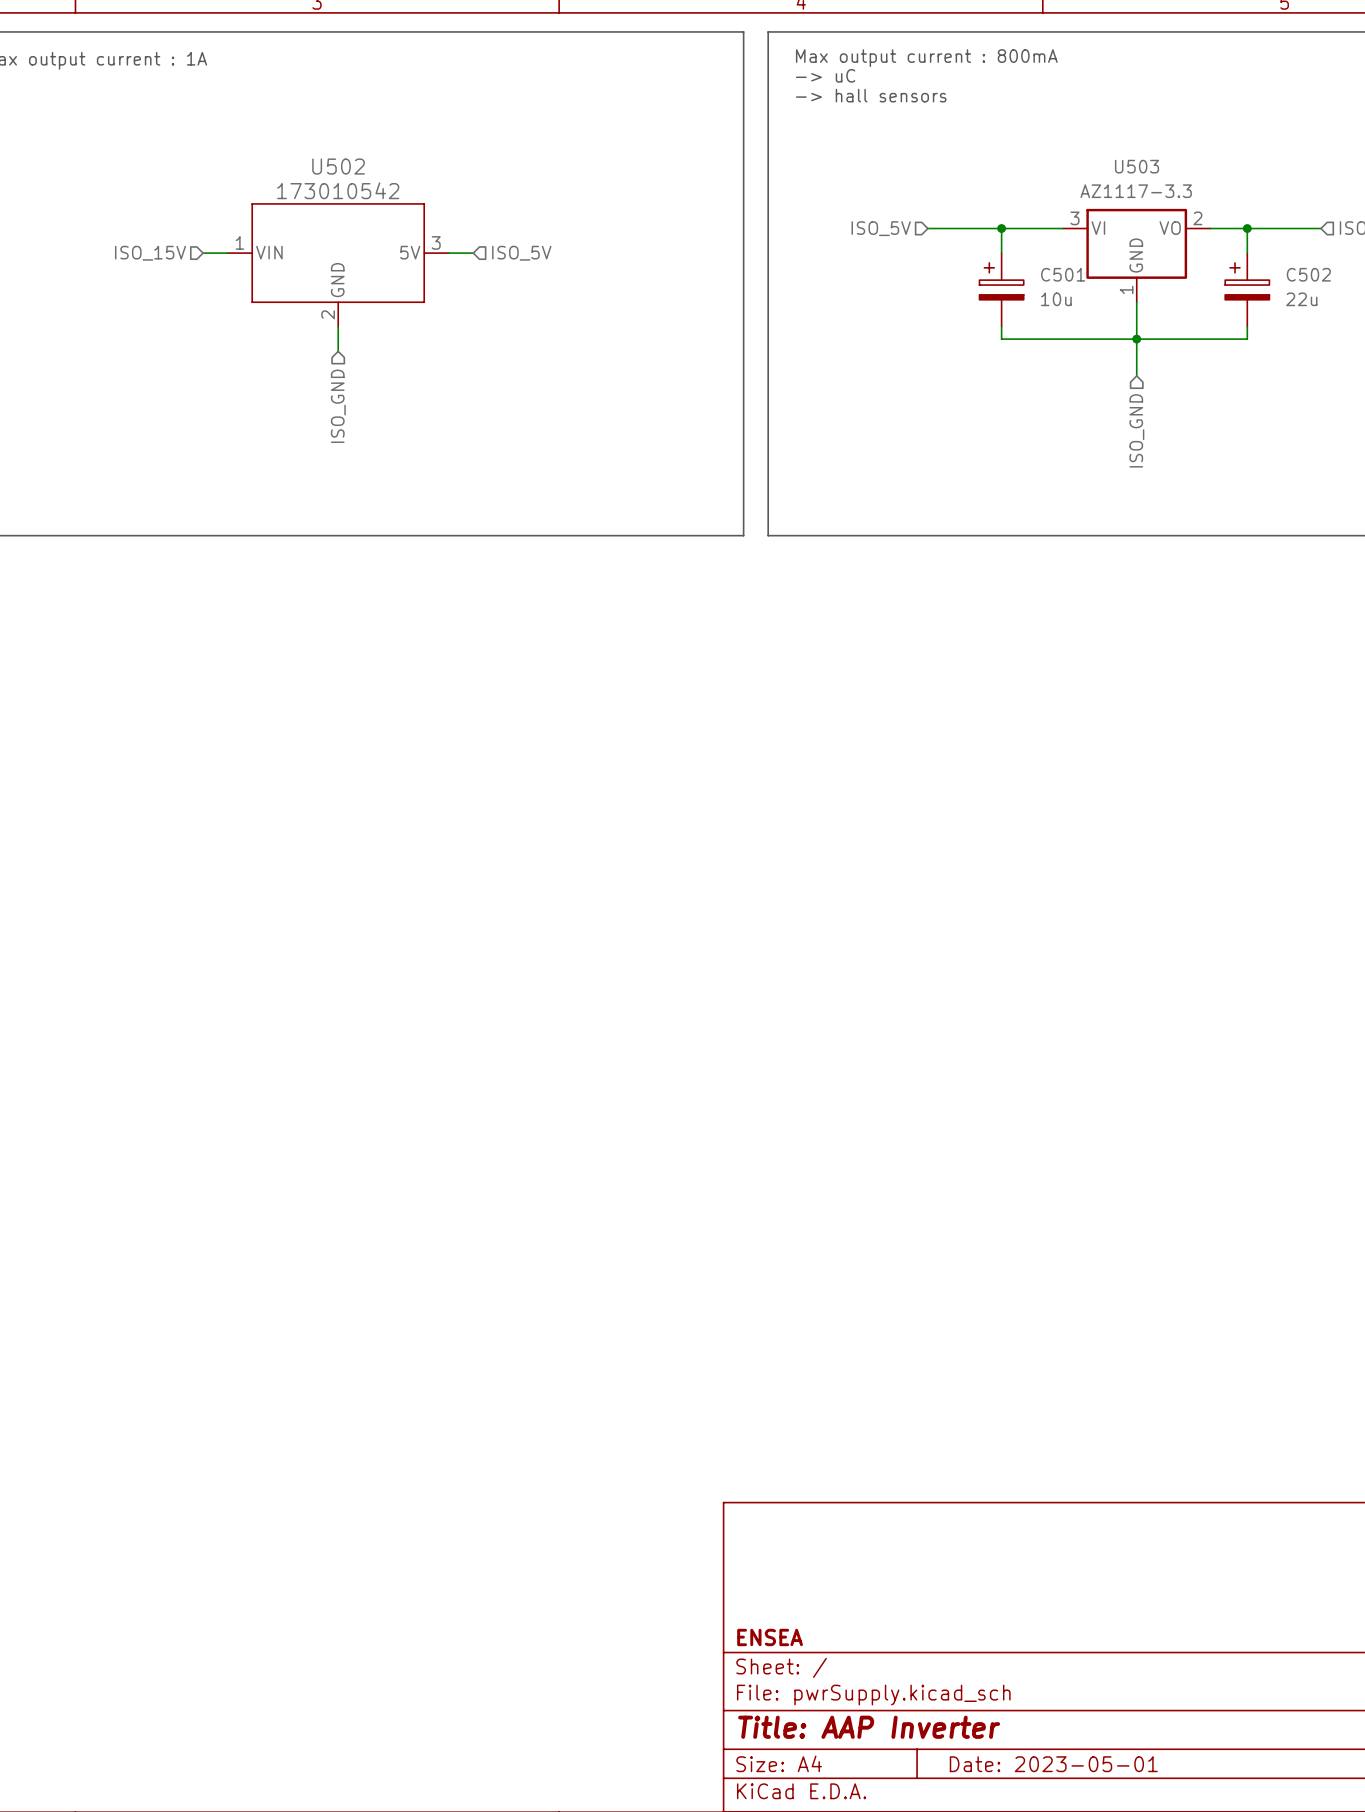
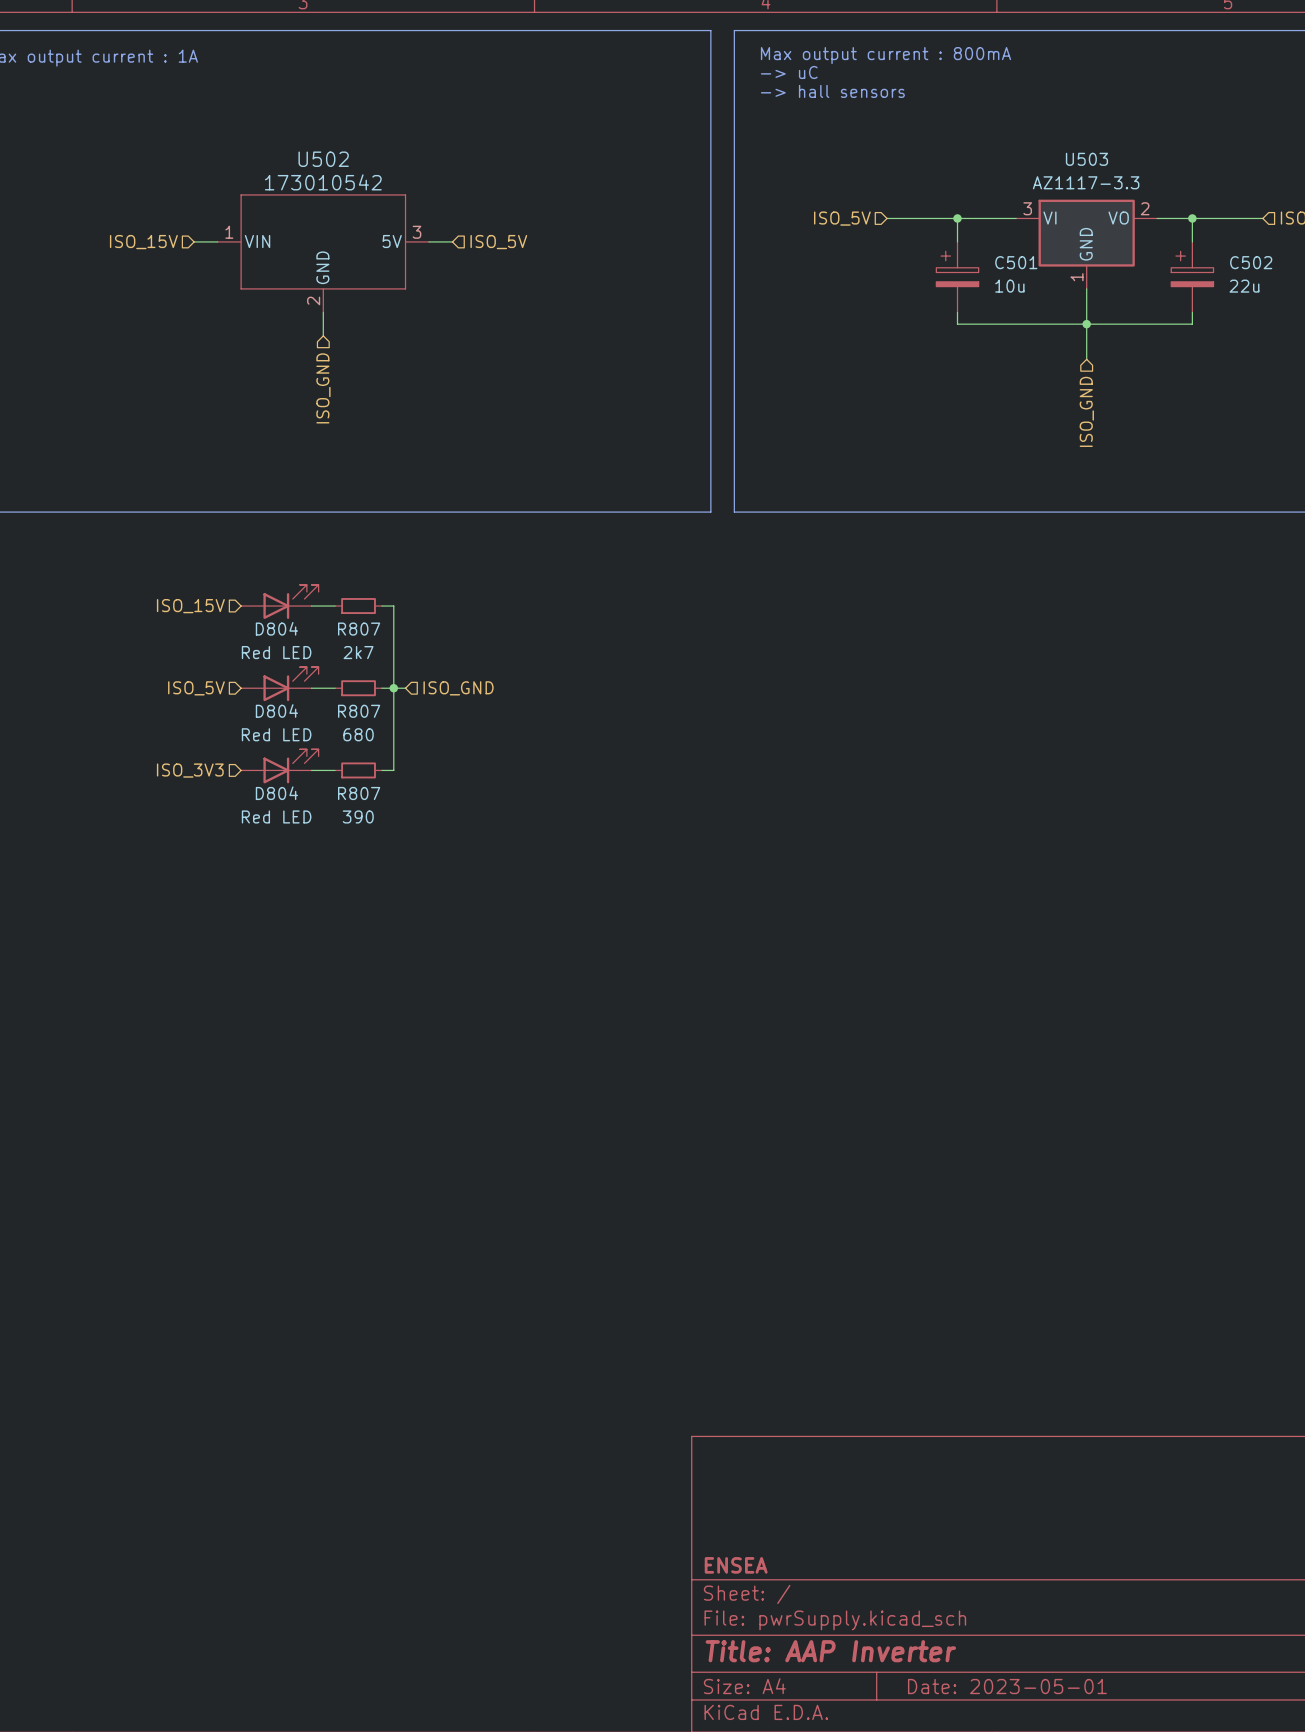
D804: none -> Red LED (279, 601)
wire: none -> (311, 606) (335, 606)
R807: none -> 2k7 (358, 606)
wire: none -> (382, 606) (393, 606) (393, 770) (382, 770)
hierarchical label: none -> ISO_15V (190, 606)
D804: none -> Red LED (279, 684)
wire: none -> (311, 688) (335, 688)
R807: none -> 680 (358, 688)
wire: none -> (382, 688) (405, 688)
junction: none -> (393, 688)
hierarchical label: none -> ISO_5V (196, 688)
hierarchical label: none -> ISO_GND (458, 688)
D804: none -> Red LED (279, 766)
wire: none -> (311, 770) (335, 770)
R807: none -> 390 (358, 770)
hierarchical label: none -> ISO_3V3 (190, 770)

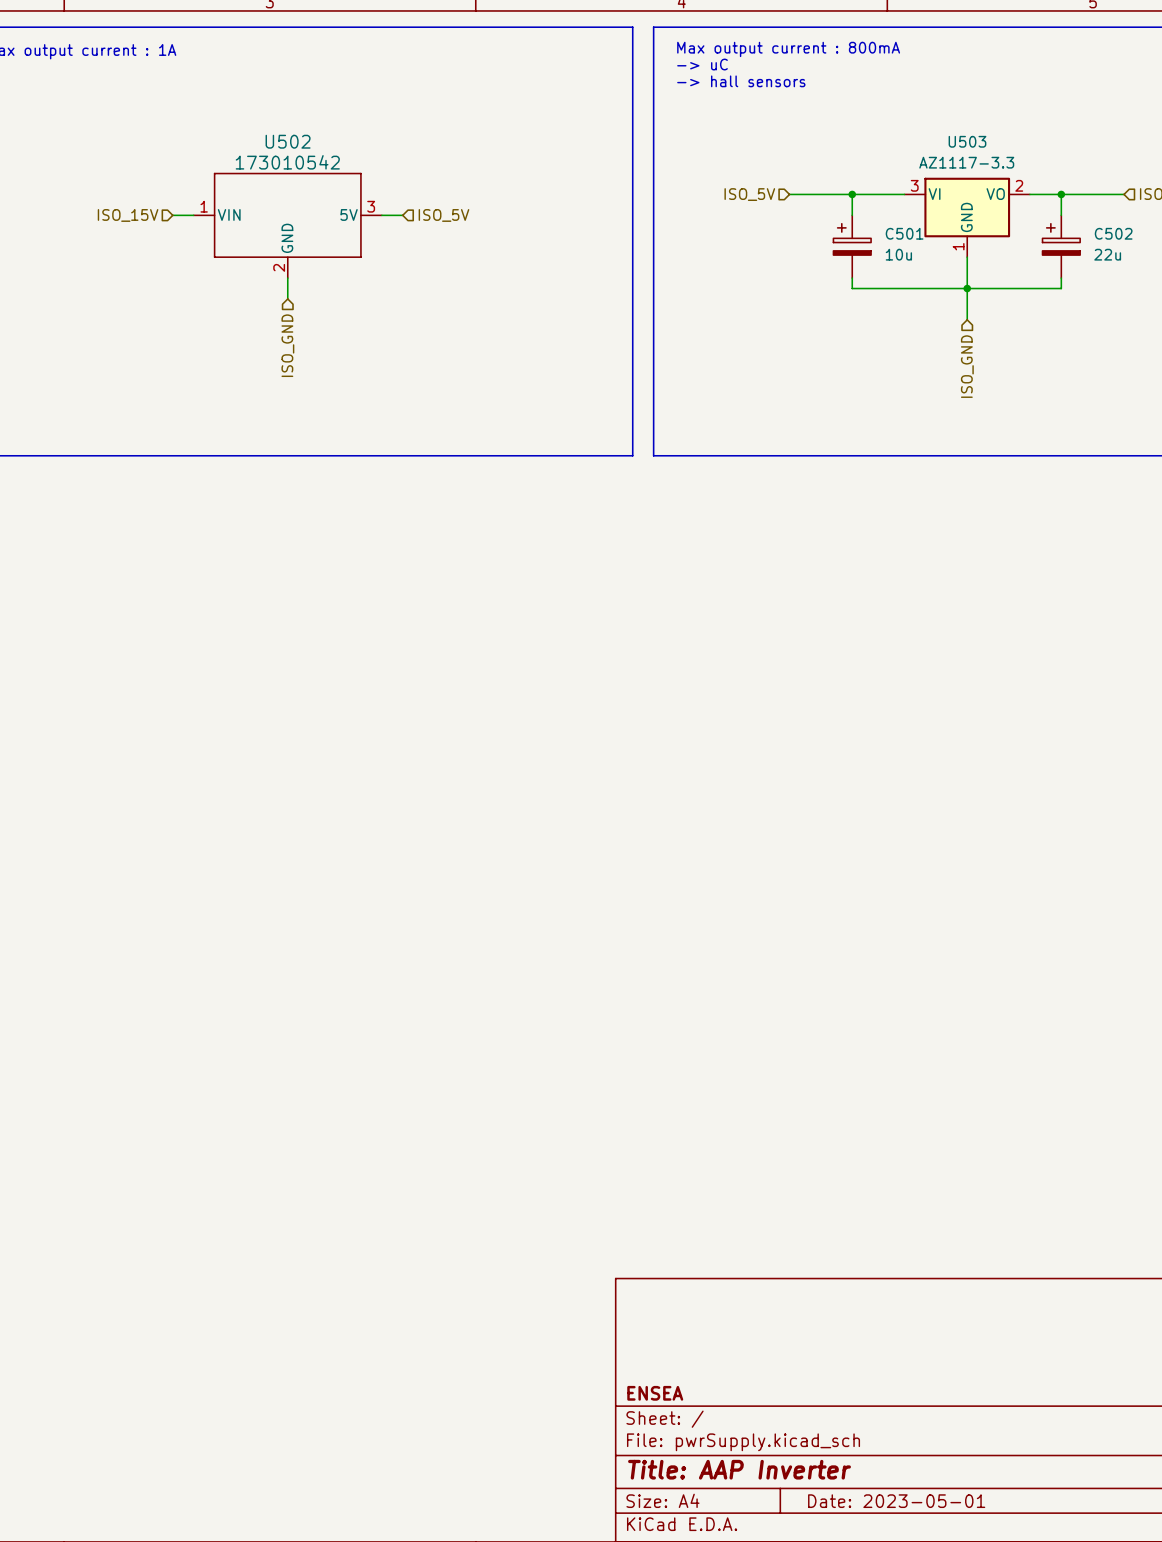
D804: Red LED (279, 601) -> none
hierarchical label: ISO_15V (190, 606) -> none
wire: (311, 606) (335, 606) -> none
R807: 2k7 (358, 606) -> none
wire: (382, 606) (393, 606) (393, 770) (382, 770) -> none
D804: Red LED (279, 684) -> none
hierarchical label: ISO_5V (196, 688) -> none
wire: (311, 688) (335, 688) -> none
R807: 680 (358, 688) -> none
wire: (382, 688) (405, 688) -> none
junction: (393, 688) -> none
hierarchical label: ISO_GND (458, 688) -> none
D804: Red LED (279, 766) -> none
hierarchical label: ISO_3V3 (190, 770) -> none
wire: (311, 770) (335, 770) -> none
R807: 390 (358, 770) -> none

